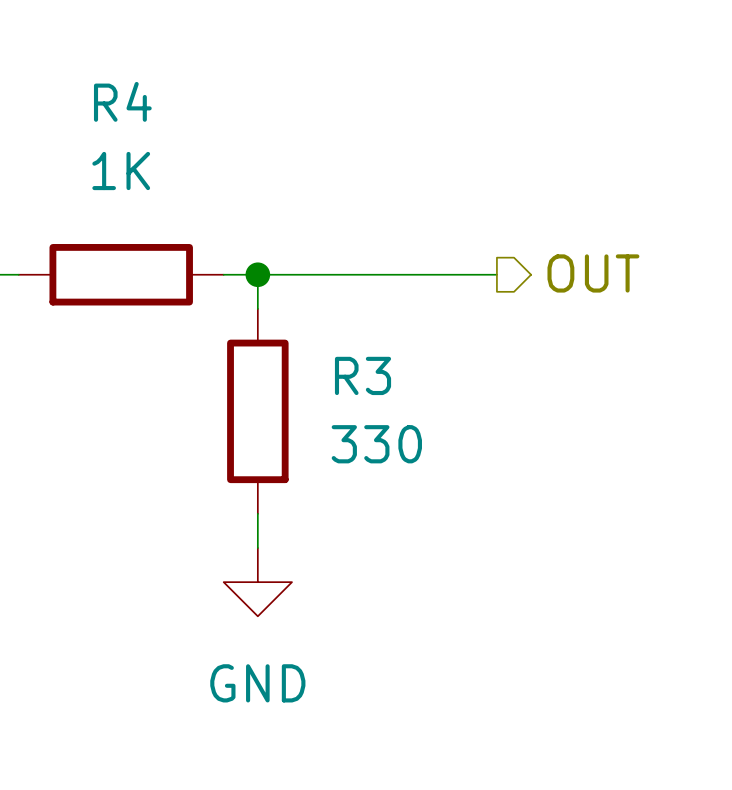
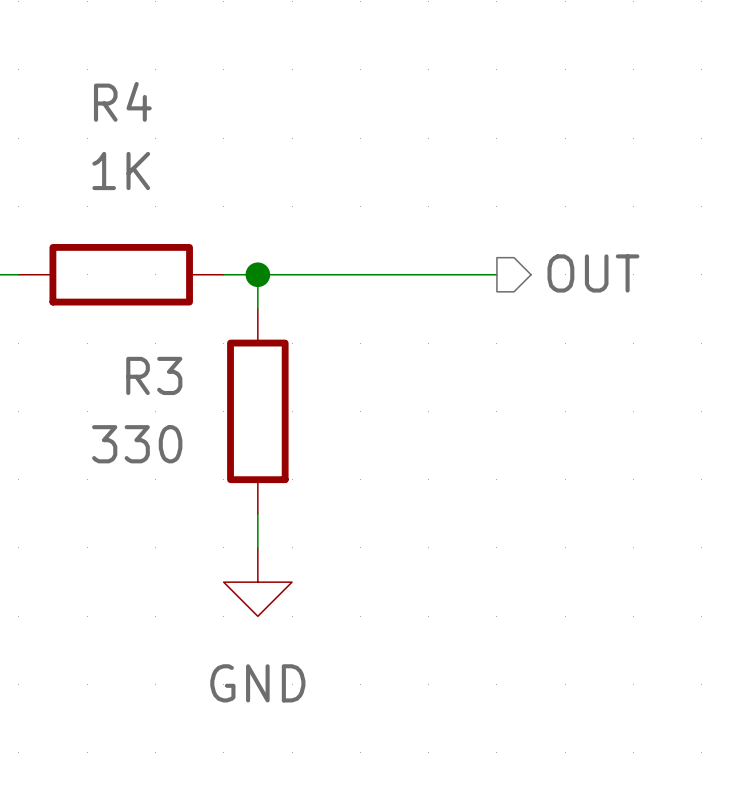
R3 name position: R3 (363, 375) -> R3 (154, 375)
R3 value position: 330 (376, 444) -> 330 (137, 444)

